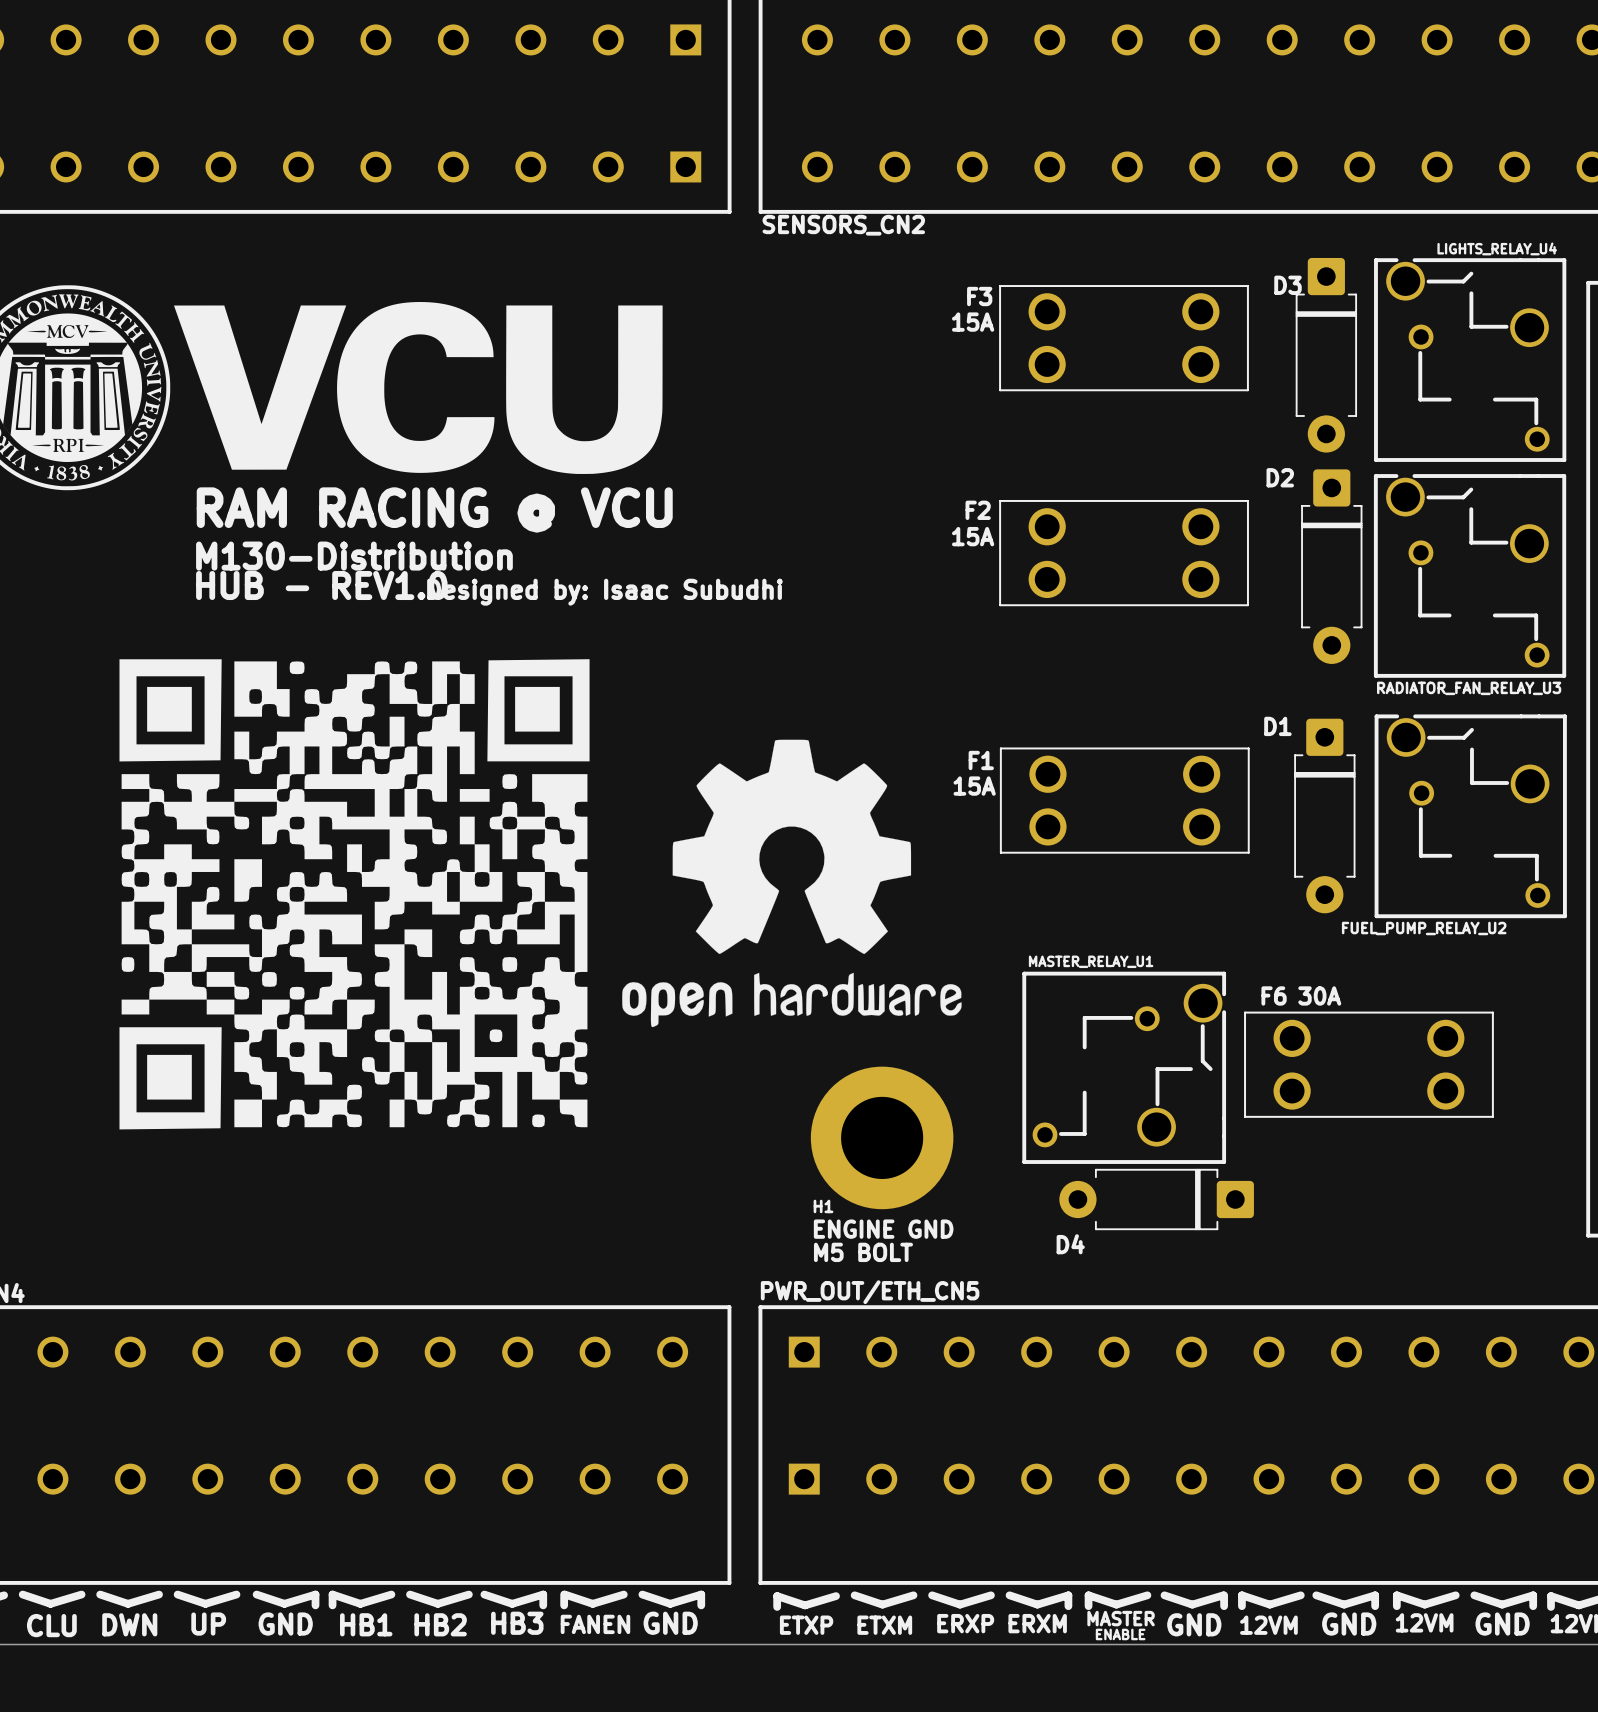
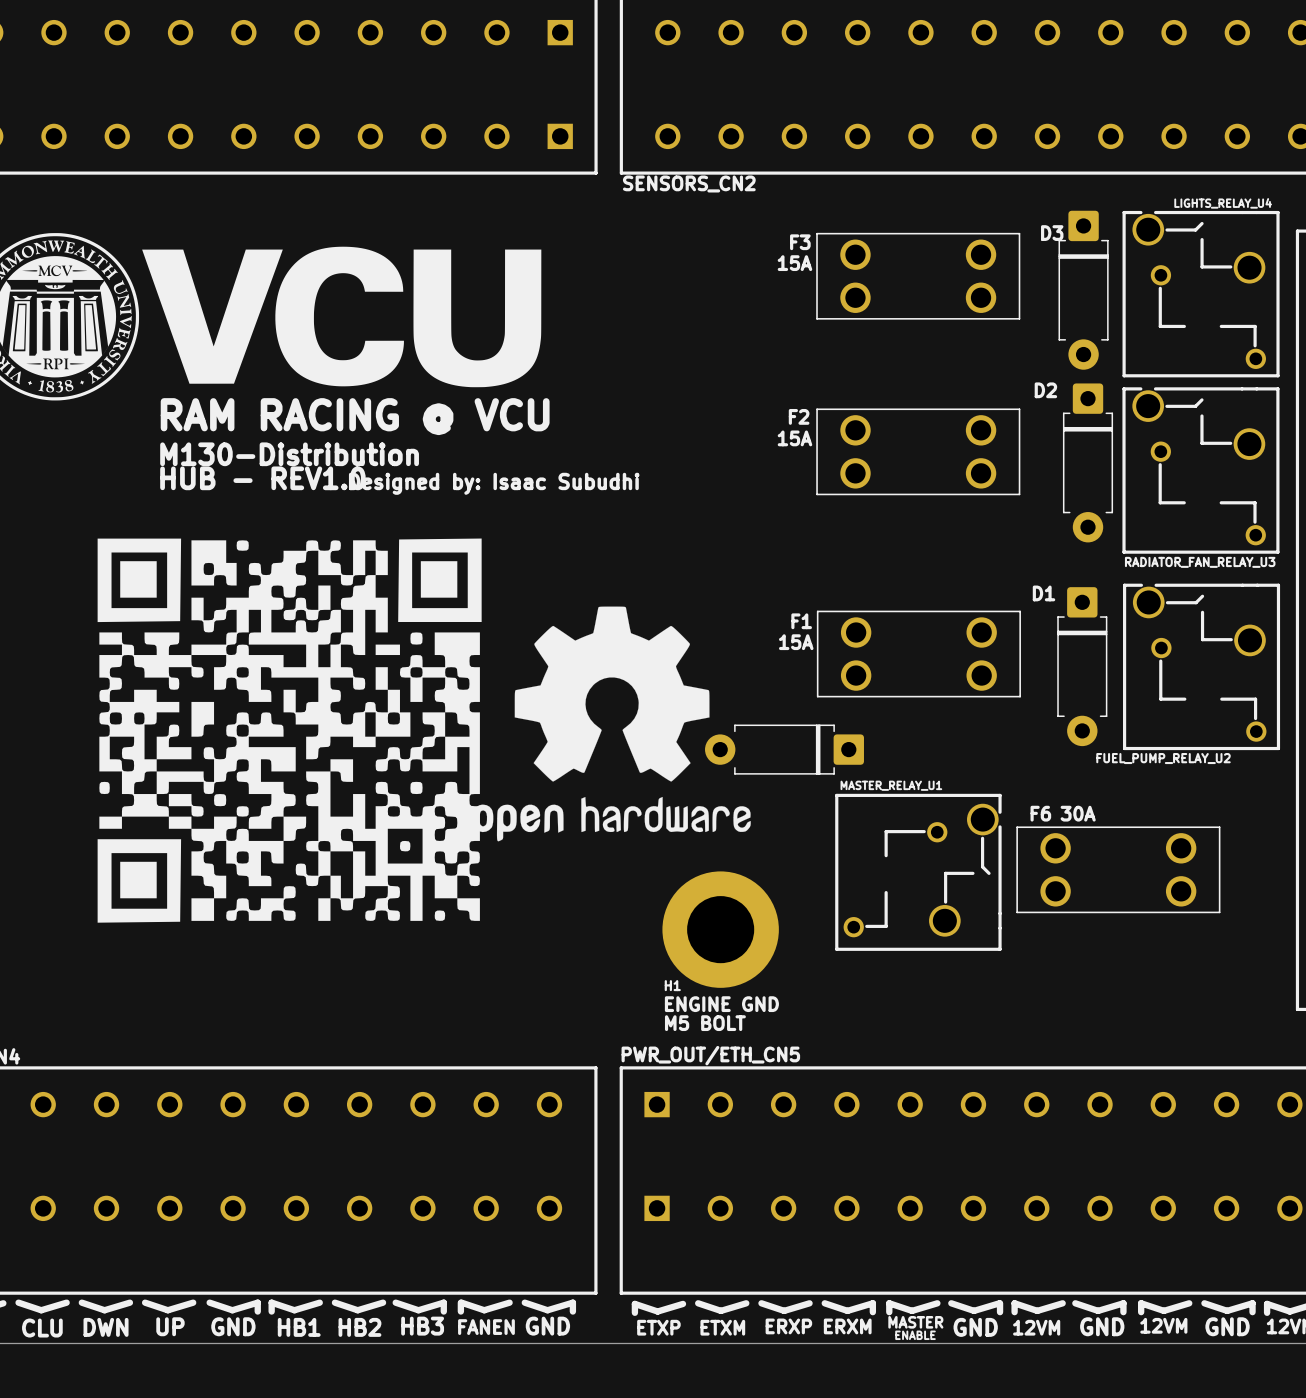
drawing position: (791, 883) -> (612, 723)
part: none -> (784, 749)
D4: (1156, 1199) -> none

